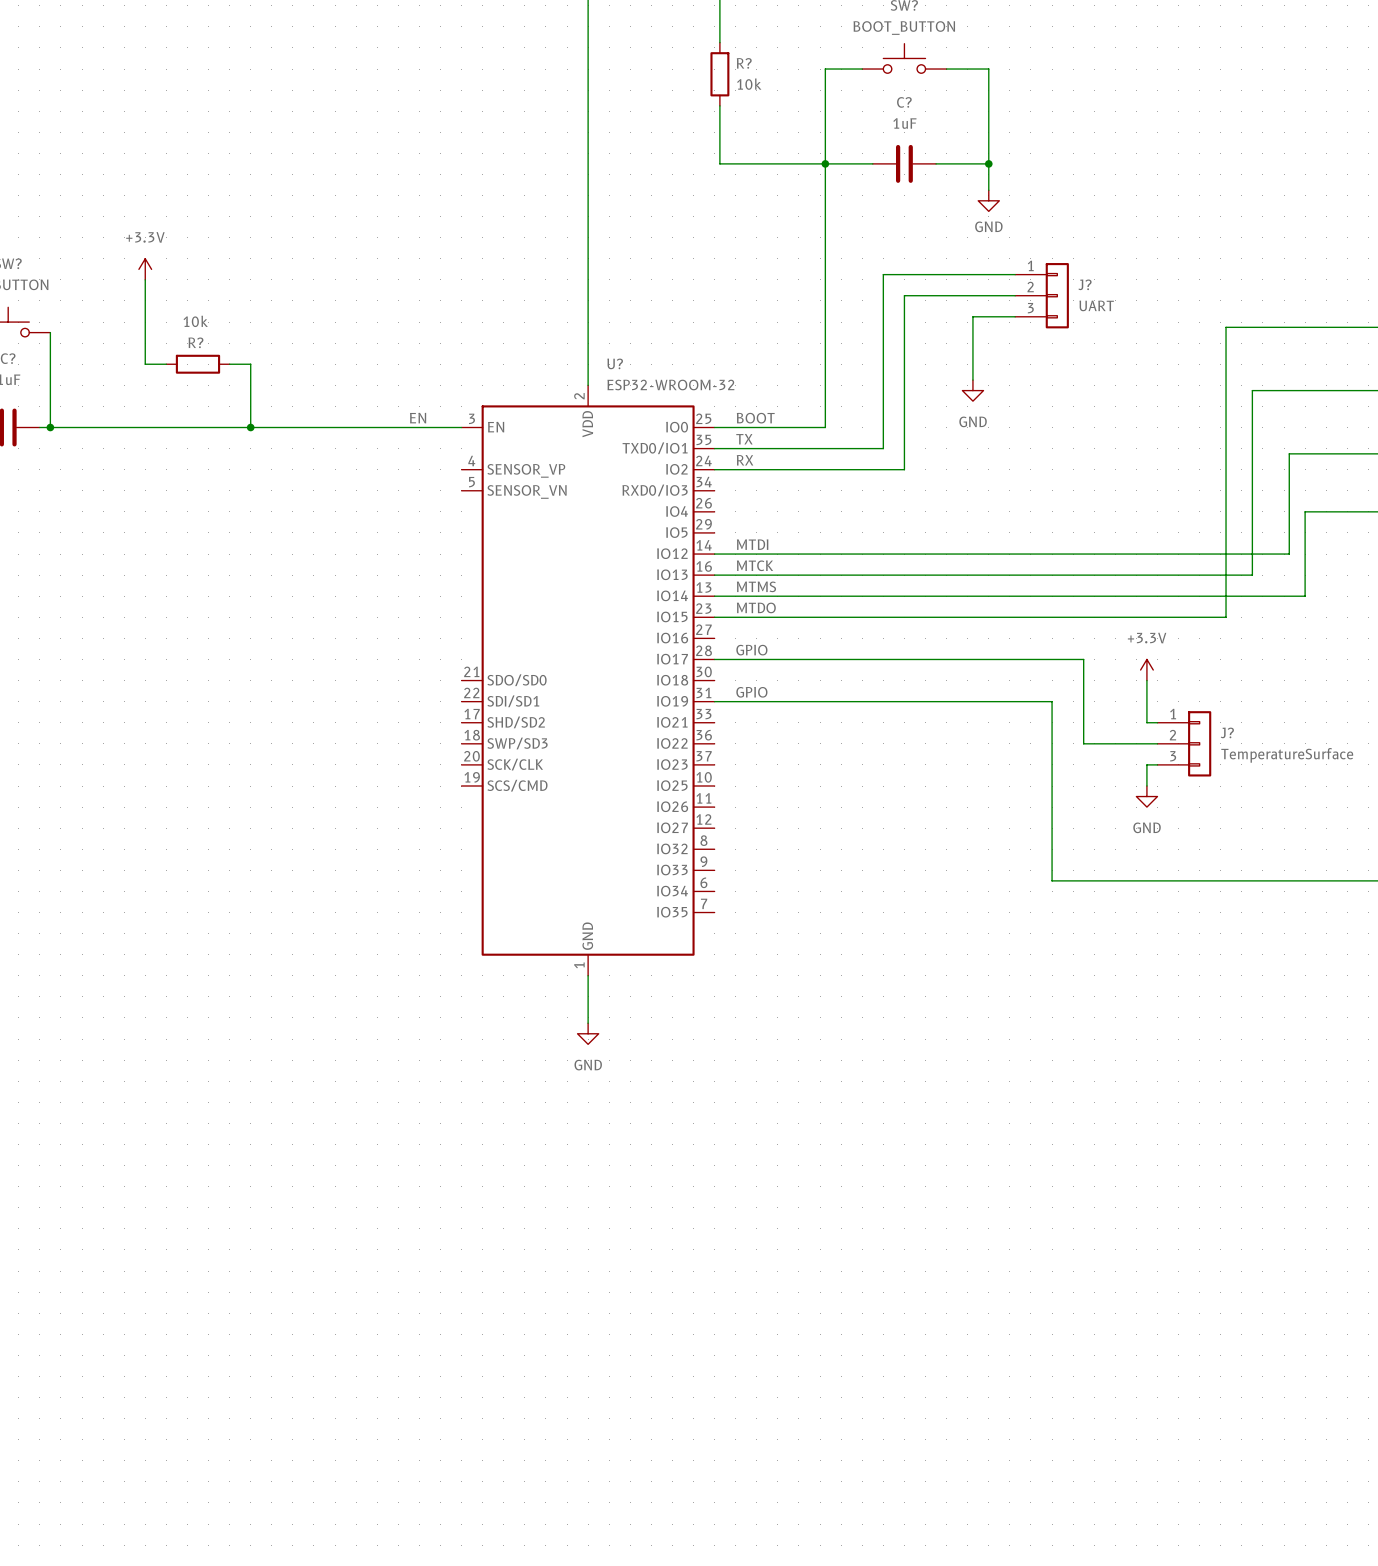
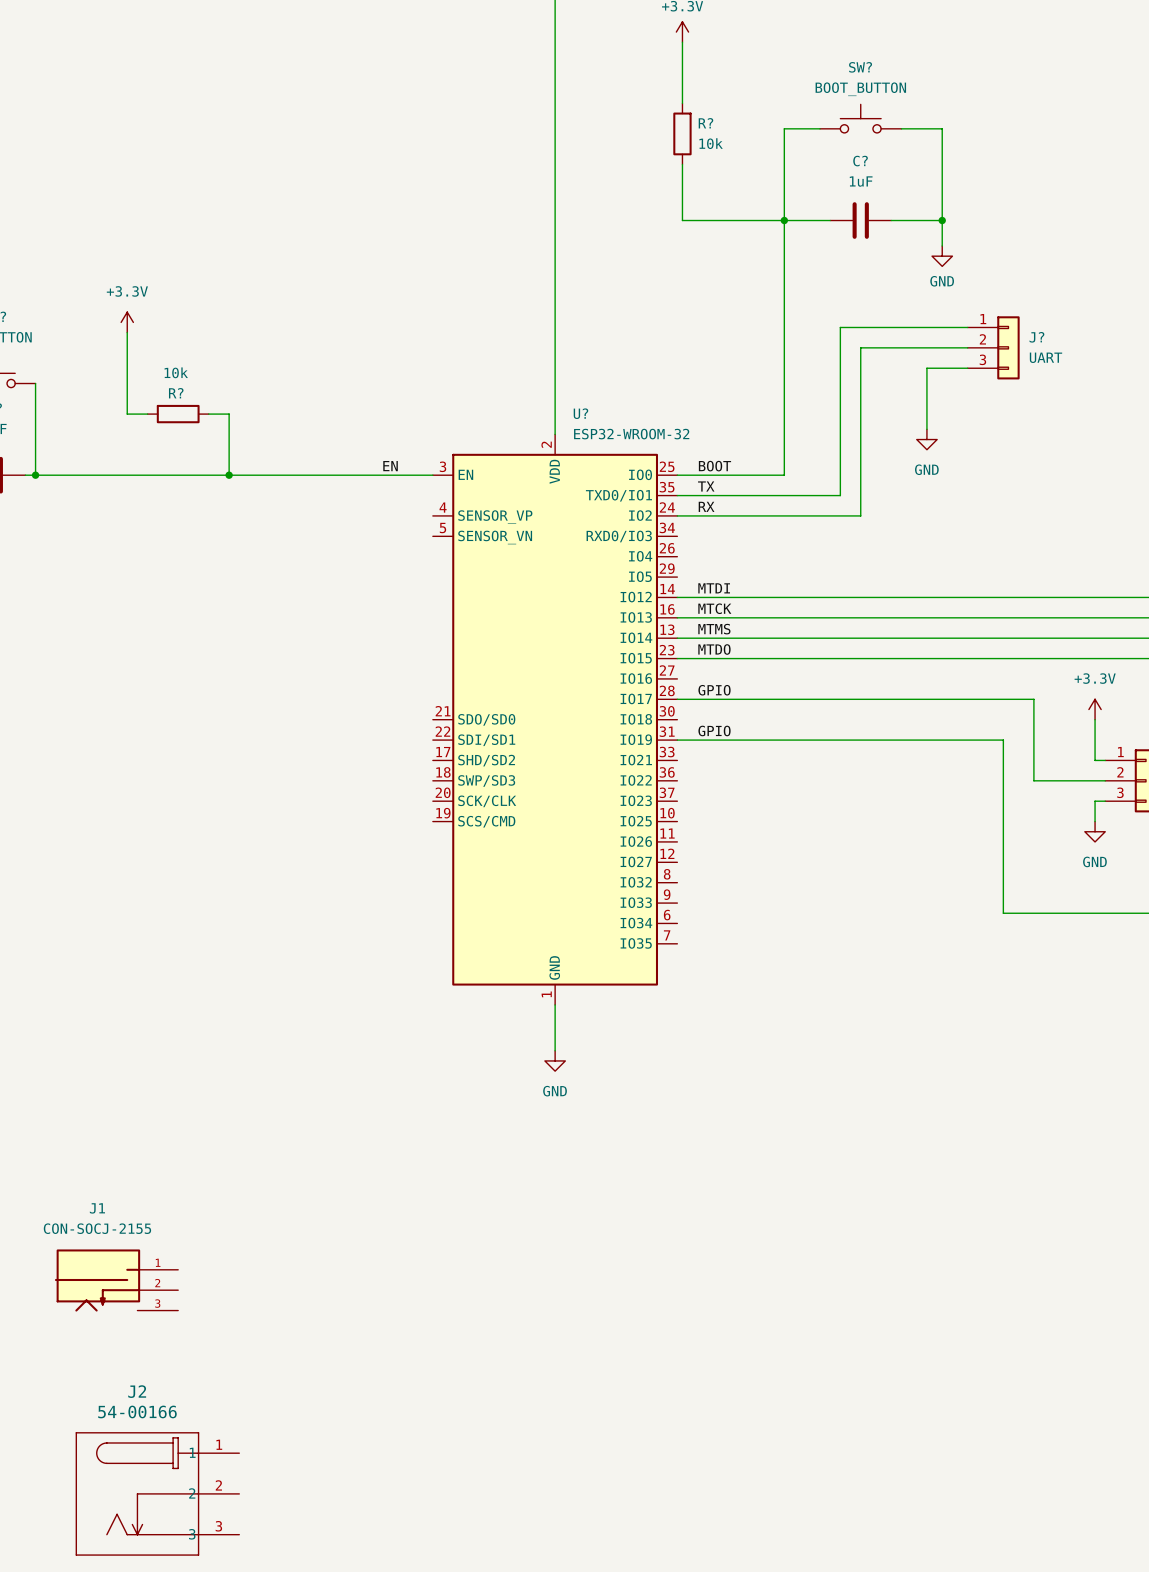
J1: none -> CON-SOCJ-2155 (116, 1280)
J2: none -> 54-00166 (157, 1493)

